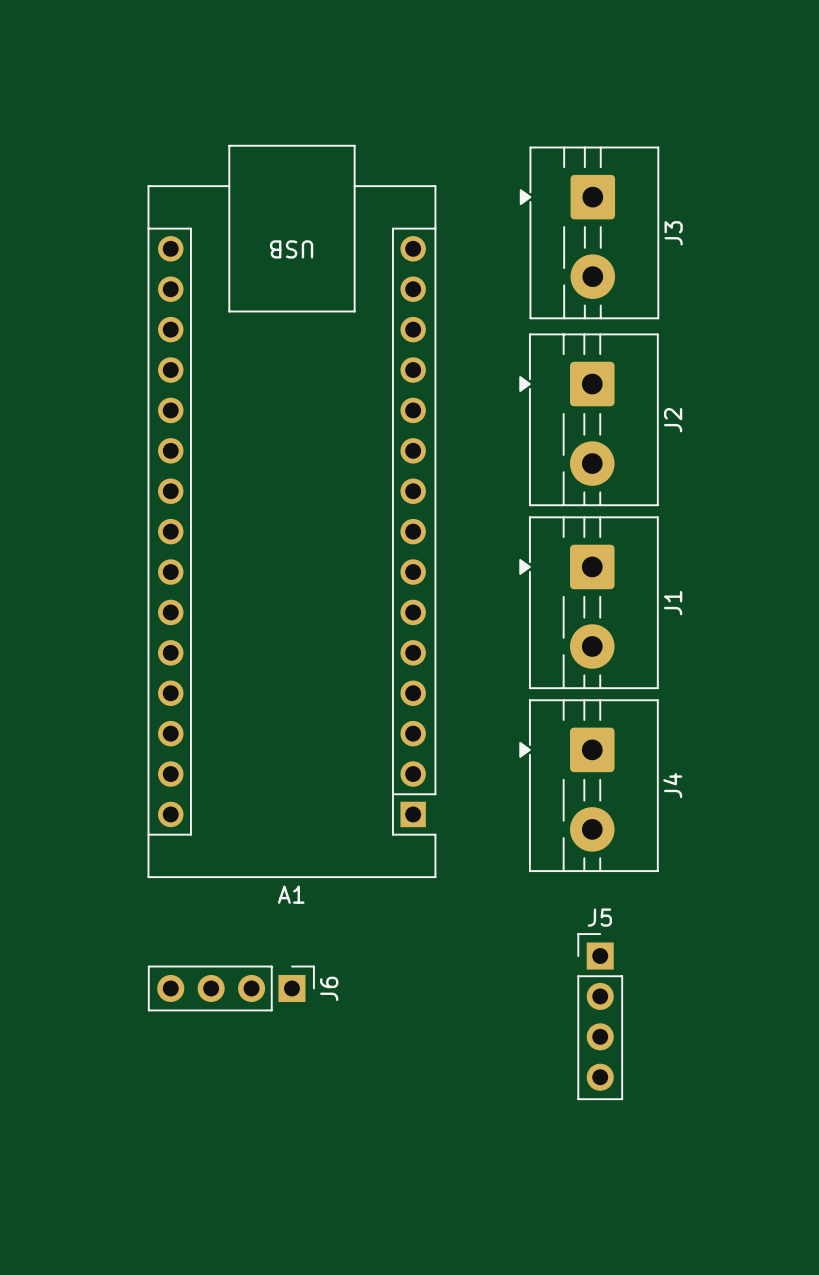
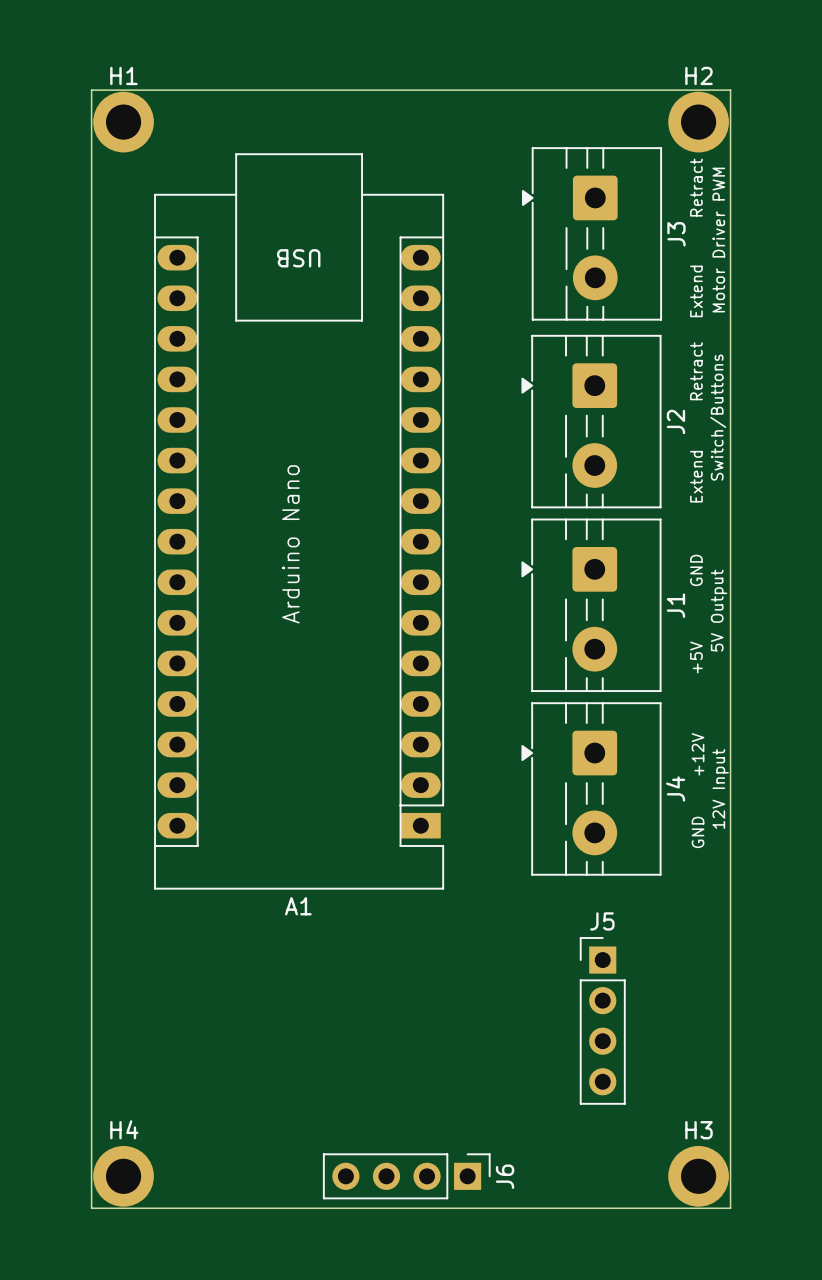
board edge: none -> (91, 90) (730, 90) (730, 1208) (91, 1208) (91, 90)
H1: none -> (123, 122)
H2: none -> (698, 122)
A1 footprint: [147, 144, 437, 879] -> [154, 153, 445, 890]
text: none -> Retract (696, 187)
text: none -> Motor Driver PWM (718, 240)
text: none -> Extend (696, 291)
text: none -> Retract (696, 371)
text: none -> Switch/Buttons (718, 417)
text: none -> Extend (696, 476)
text: none -> Arduino Nano (290, 544)
text: none -> GND (696, 570)
text: none -> 5V Output (719, 610)
text: none -> +5V (696, 657)
text: none -> +12V (698, 754)
text: none -> 12V Input (720, 788)
text: none -> GND (698, 832)
J6 position: (231, 988) -> (406, 1176)
H4: none -> (123, 1176)
H3: none -> (698, 1176)

